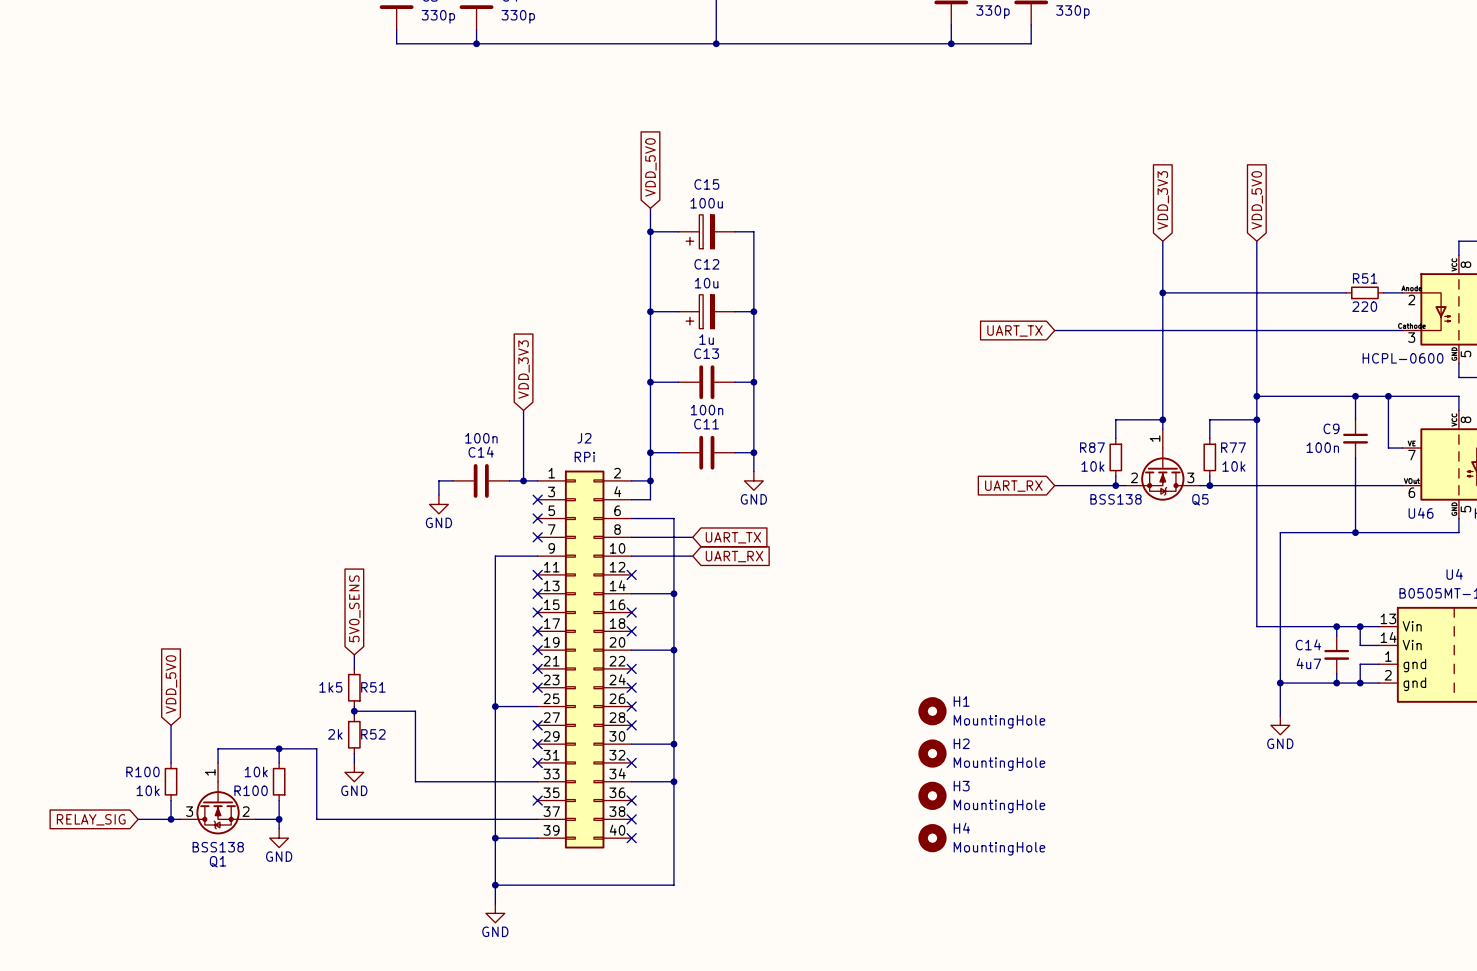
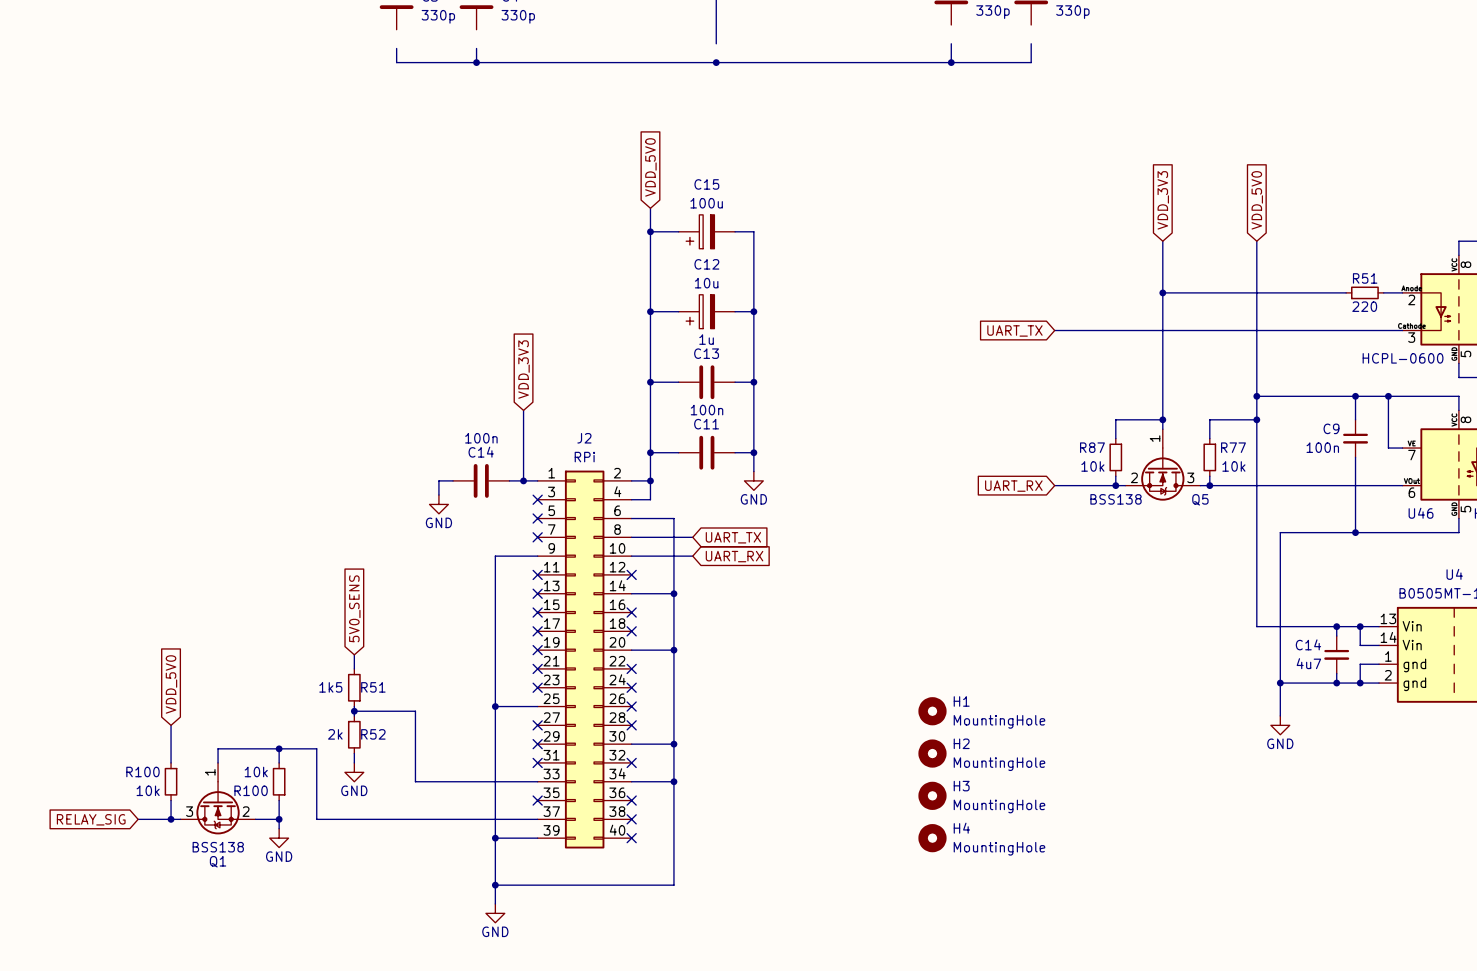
wire: (951, 24) (951, 43) -> (951, 62) (951, 43)
wire: (1031, 24) (1031, 43) (396, 43) (396, 29) -> (1031, 43) (1031, 62) (396, 62) (396, 48)
wire: (476, 29) (476, 43) -> (476, 48) (476, 62)
junction position: (476, 43) -> (476, 62)
junction position: (716, 43) -> (716, 62)
junction position: (951, 43) -> (951, 62)

